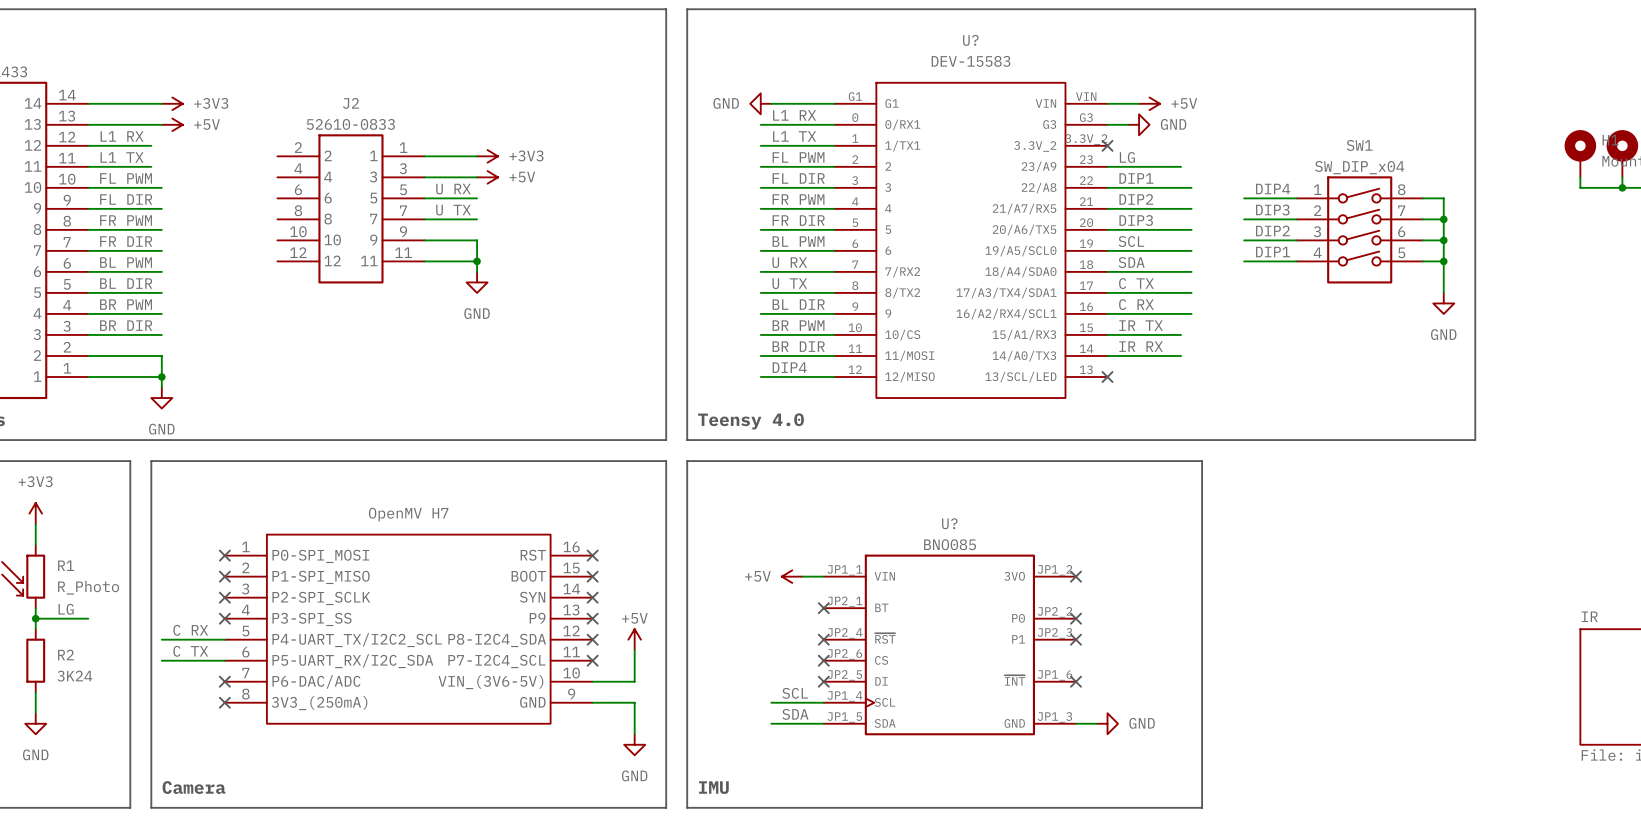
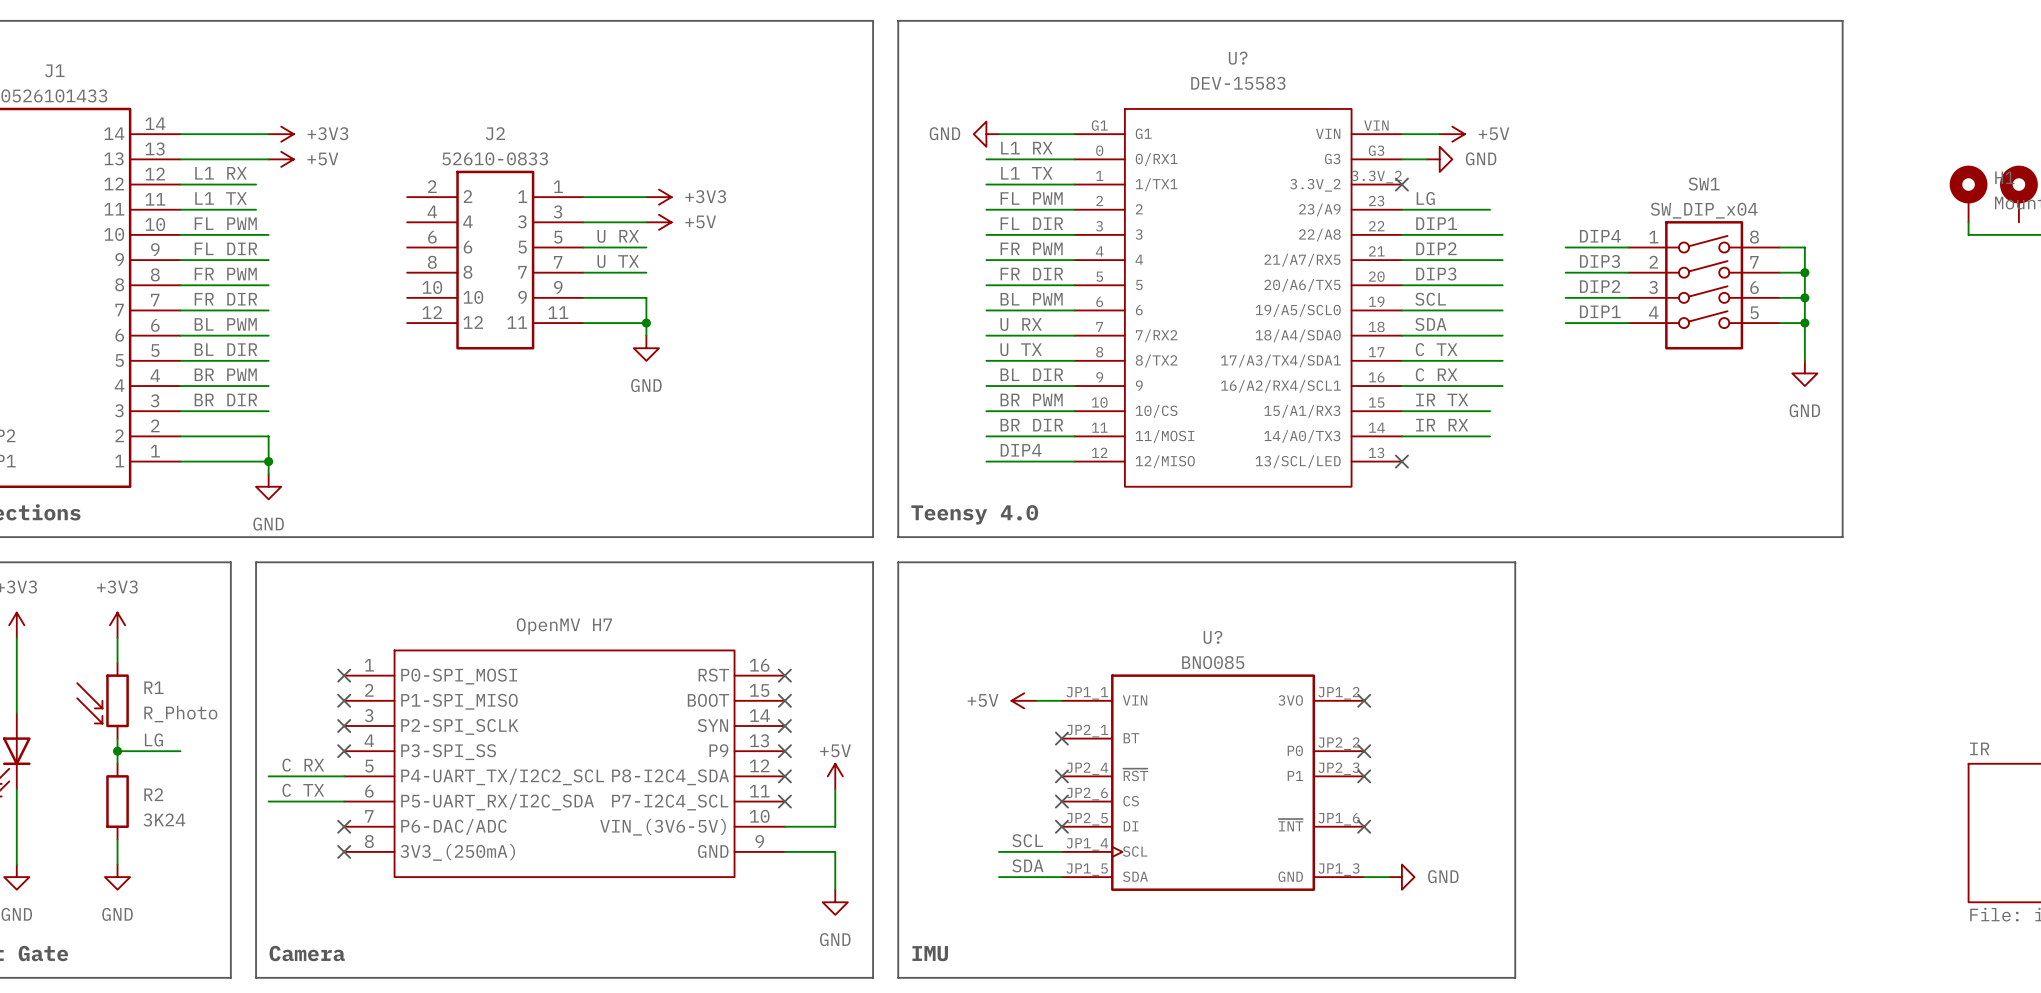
wire: (1622, 177) (1622, 187) -> none
junction: (1622, 187) -> none

